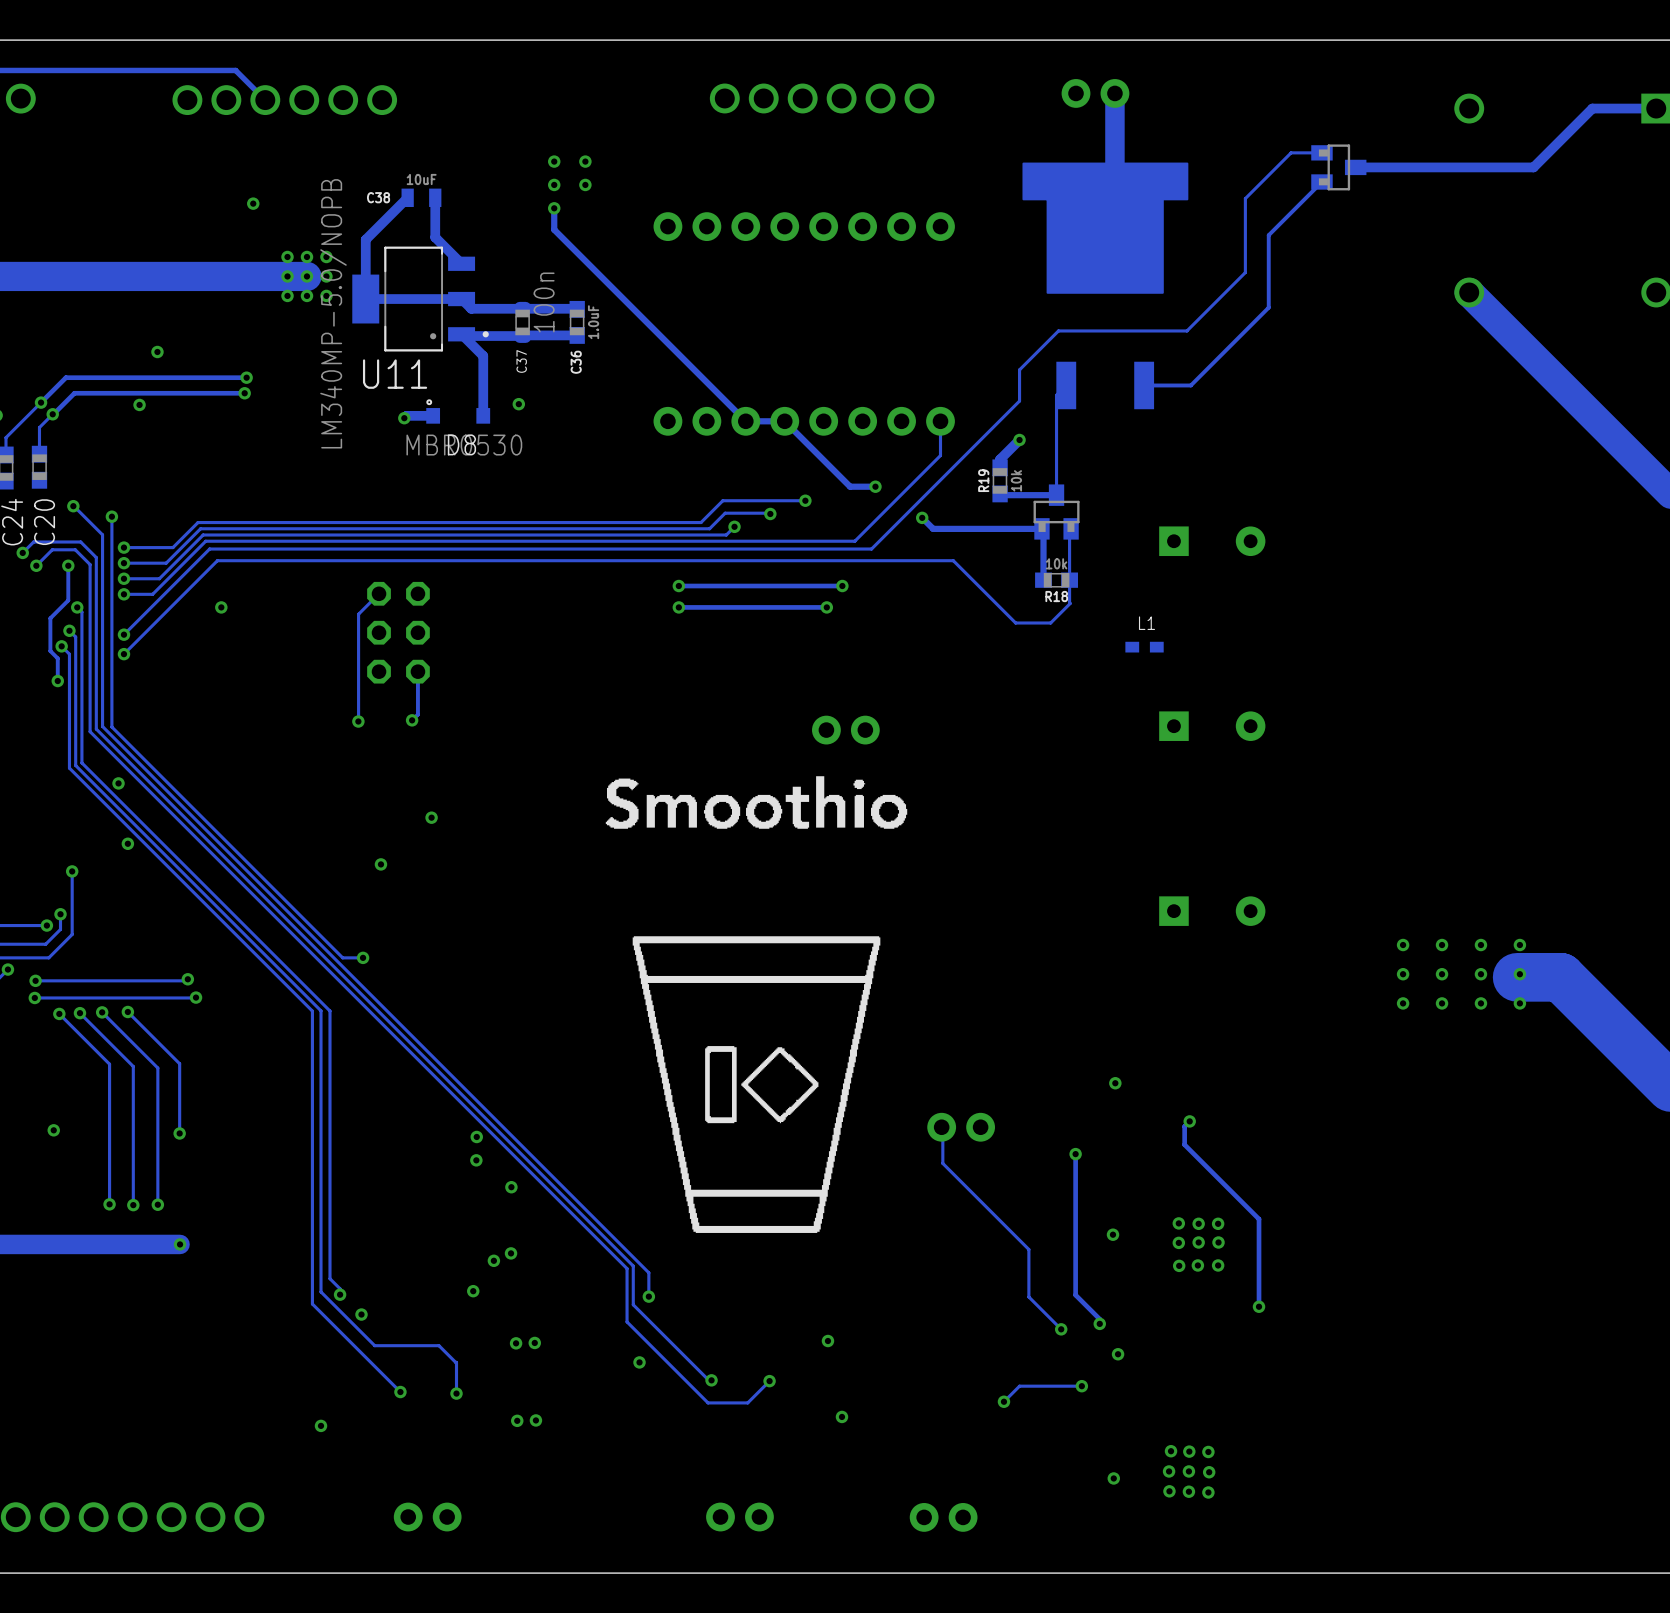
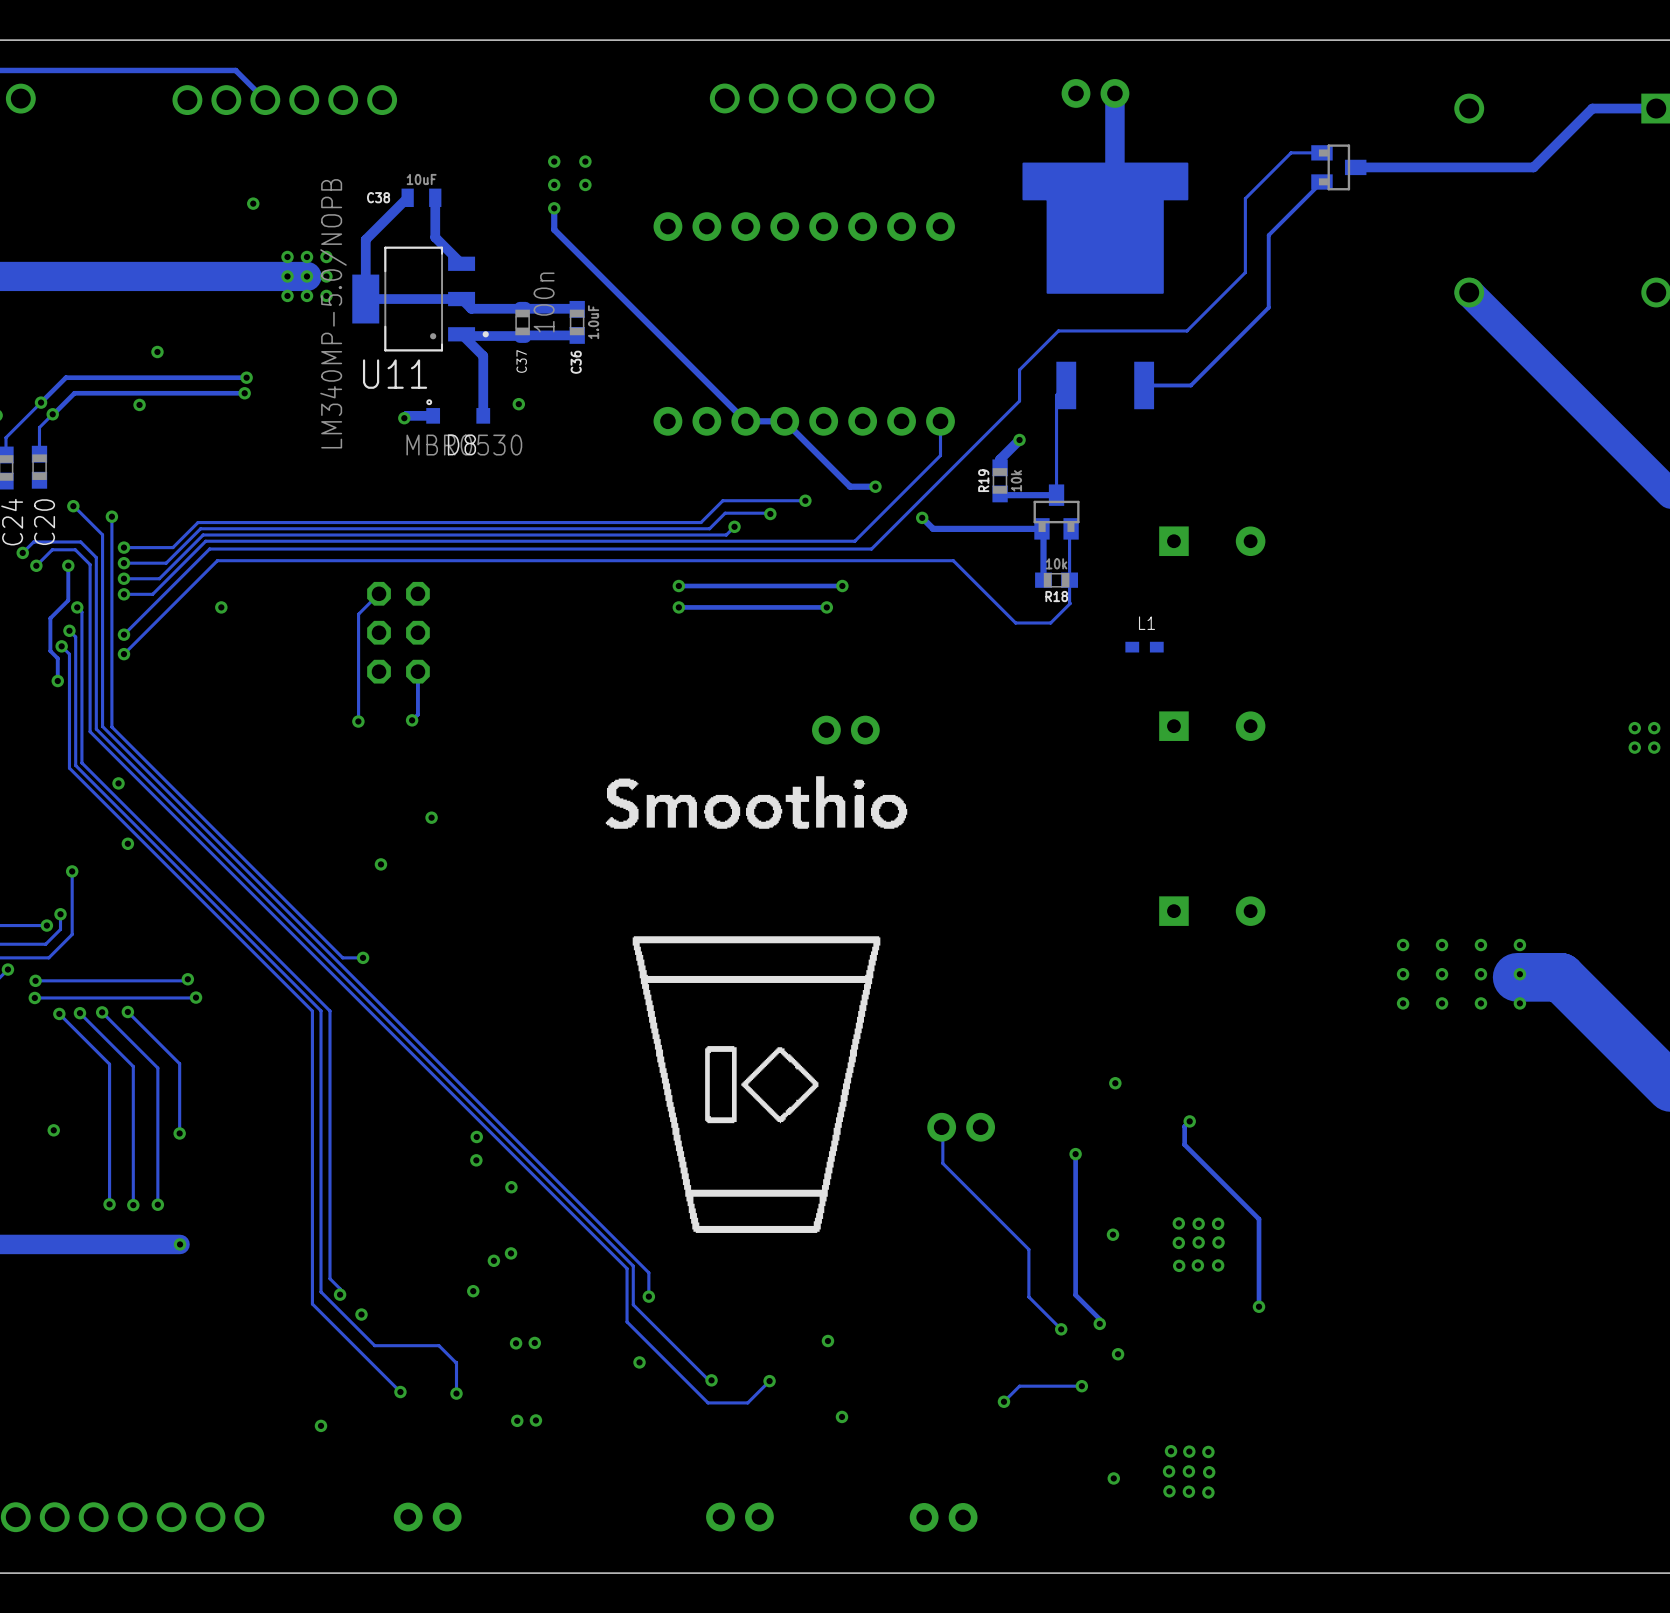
via: none -> (1634, 728)
via: none -> (1654, 728)
via: none -> (1634, 747)
via: none -> (1654, 747)

